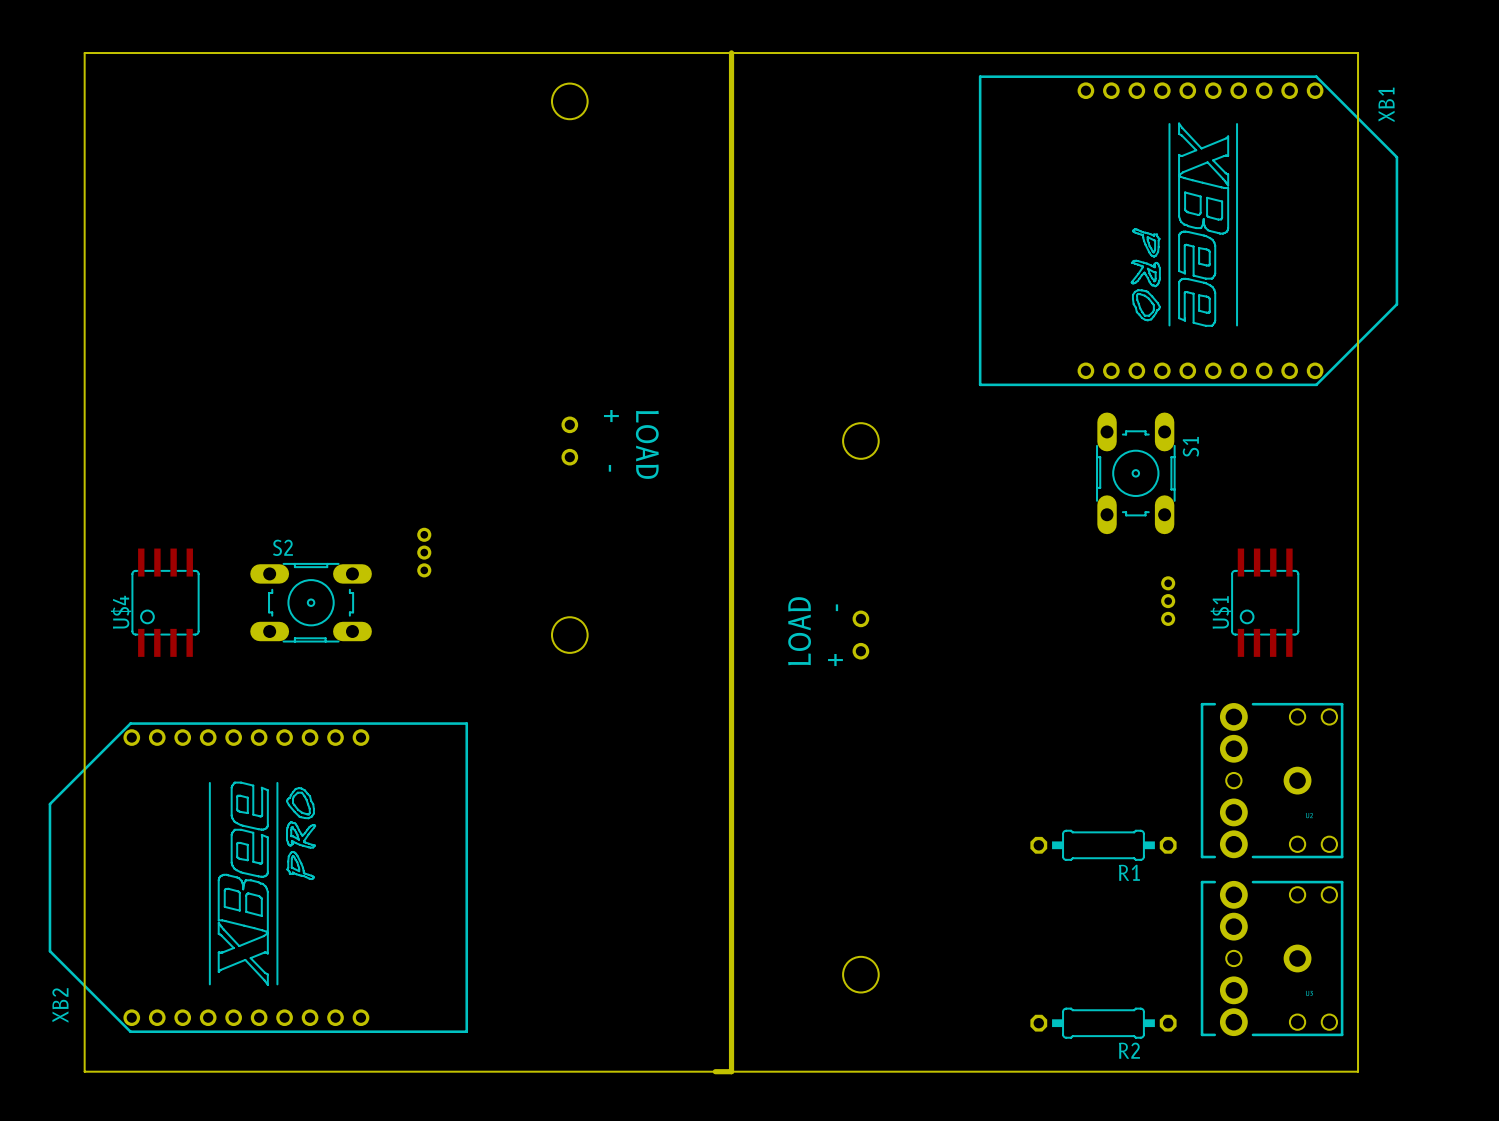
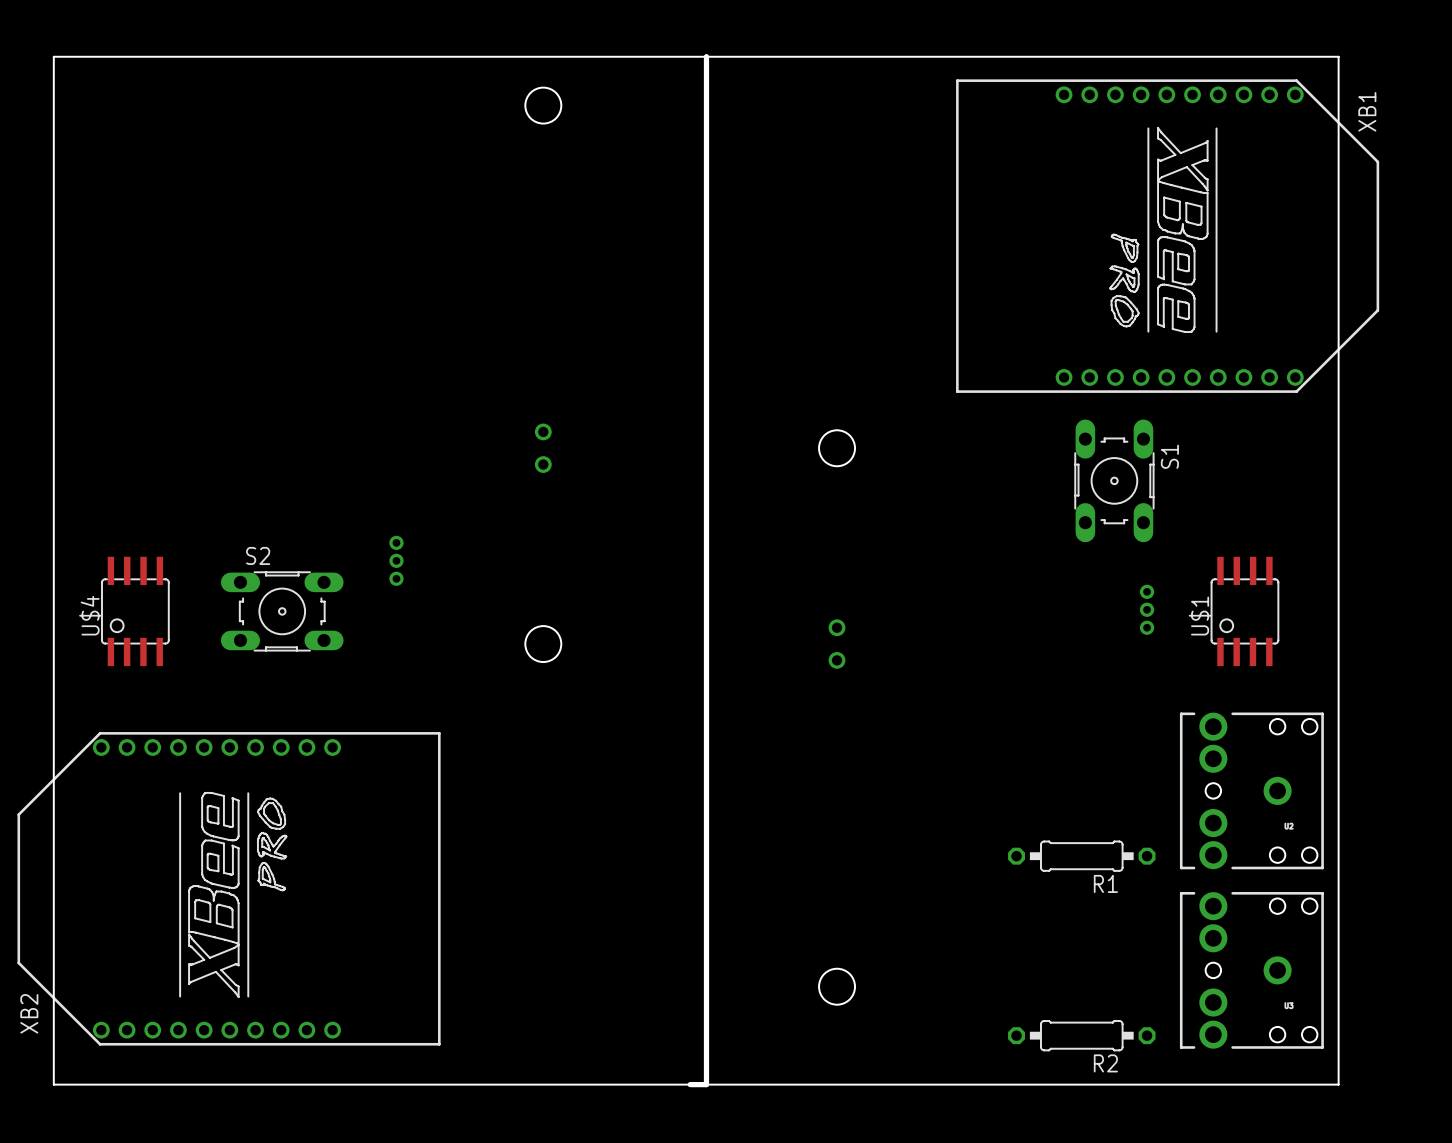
text: + - (611, 440) -> none
text: LOAD (647, 444) -> none
text: LOAD (799, 631) -> none
text: + - (835, 635) -> none

